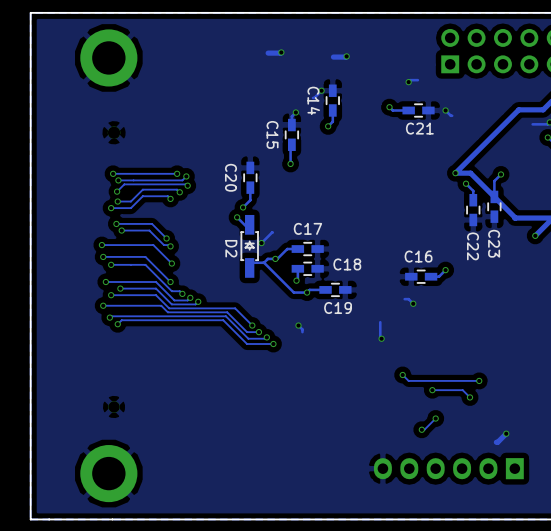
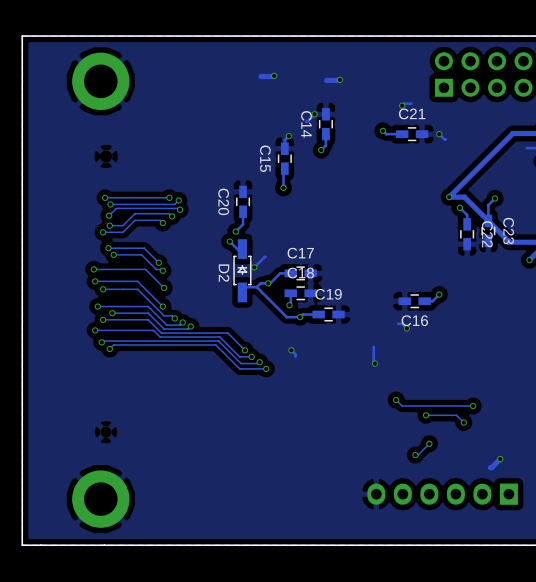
C21 name position: C21 (419, 128) -> C21 (412, 113)
C23 name position: C23 (494, 243) -> C23 (508, 231)
C22 name position: C22 (473, 246) -> C22 (487, 234)
C16 name position: C16 (418, 256) -> C16 (414, 320)
C18 name position: C18 (347, 264) -> C18 (300, 273)
C19 name position: C19 (338, 307) -> C19 (328, 294)

